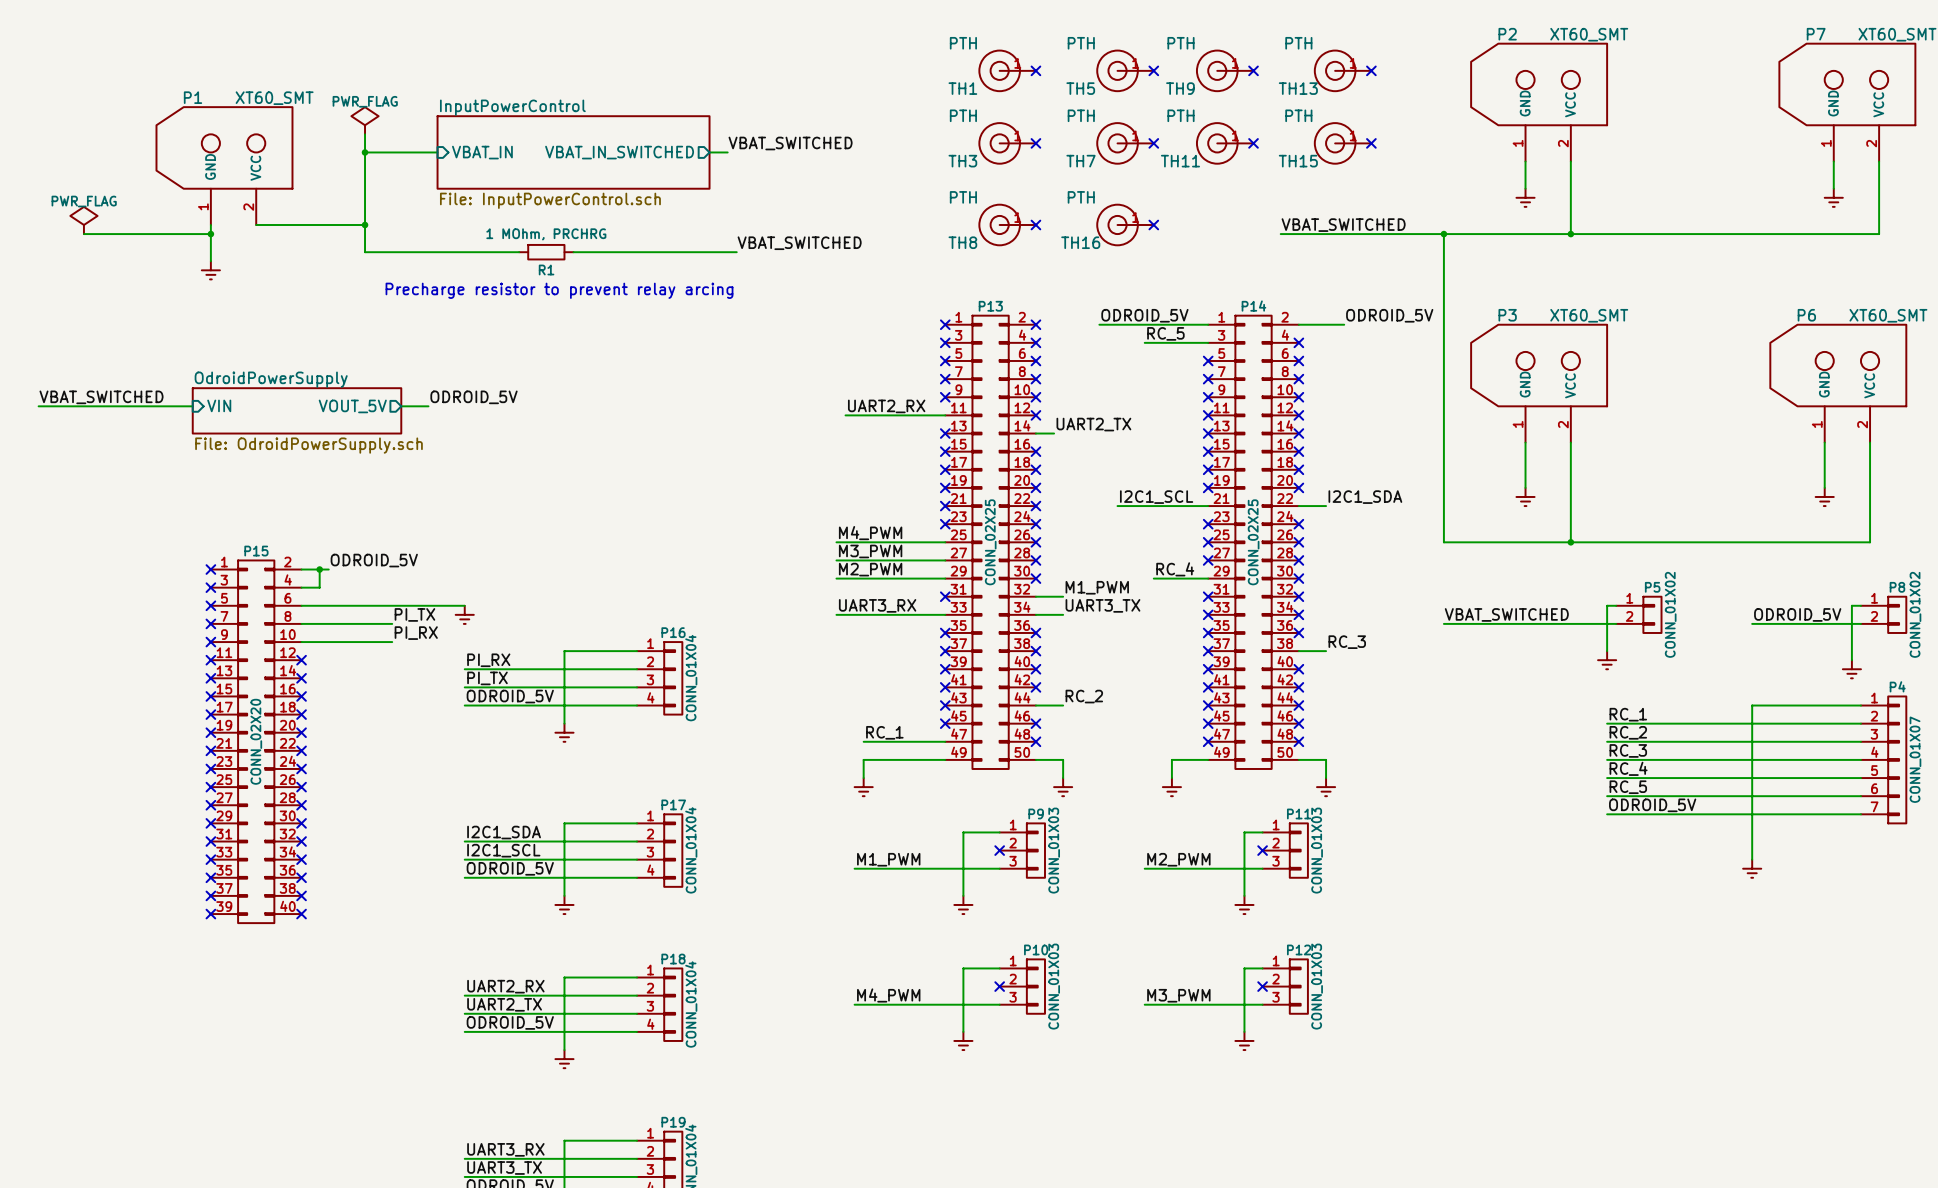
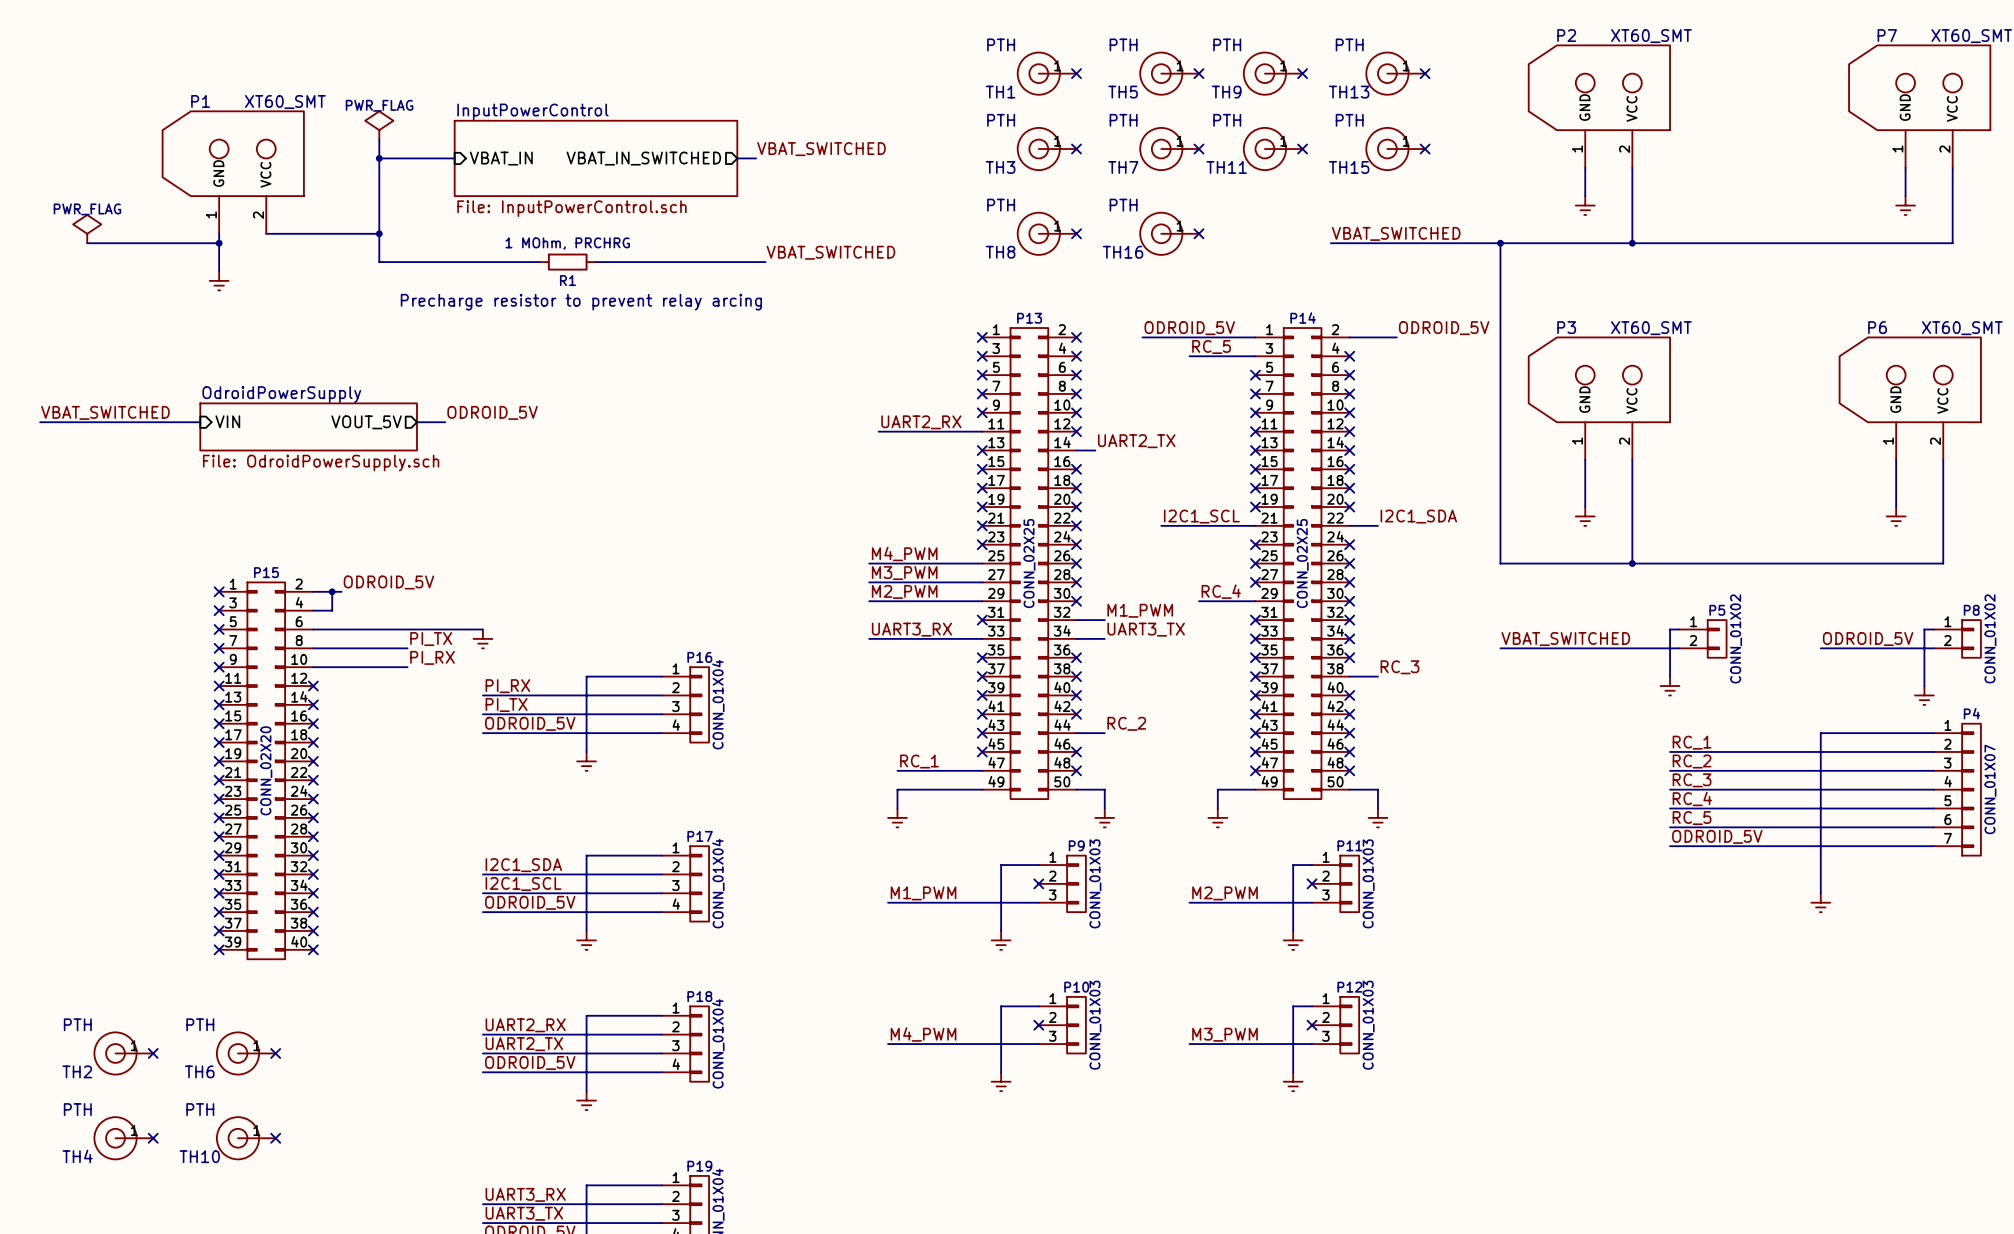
TH2: none -> PTH (123, 1053)
no-connect mark: none -> (153, 1053)
TH6: none -> PTH (246, 1053)
no-connect mark: none -> (275, 1053)
TH4: none -> PTH (123, 1138)
no-connect mark: none -> (153, 1138)
TH10: none -> PTH (246, 1138)
no-connect mark: none -> (275, 1138)

